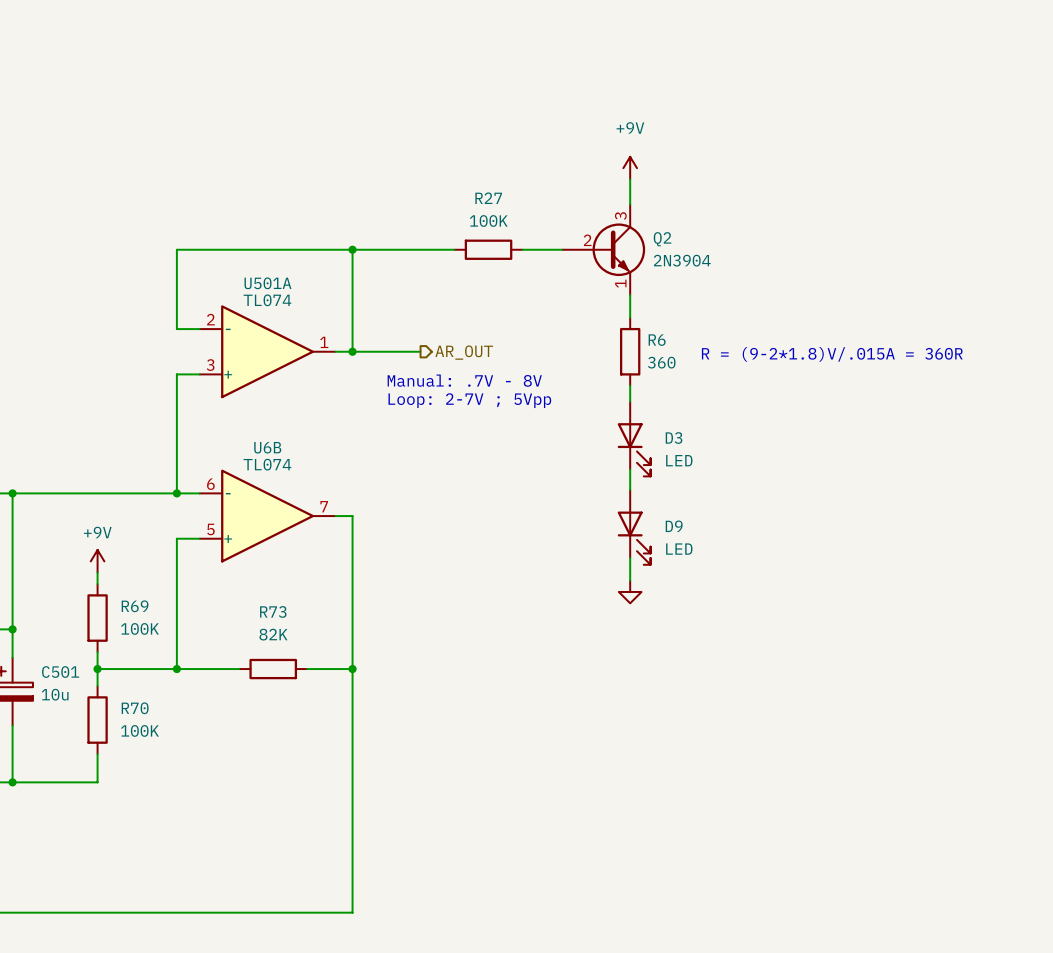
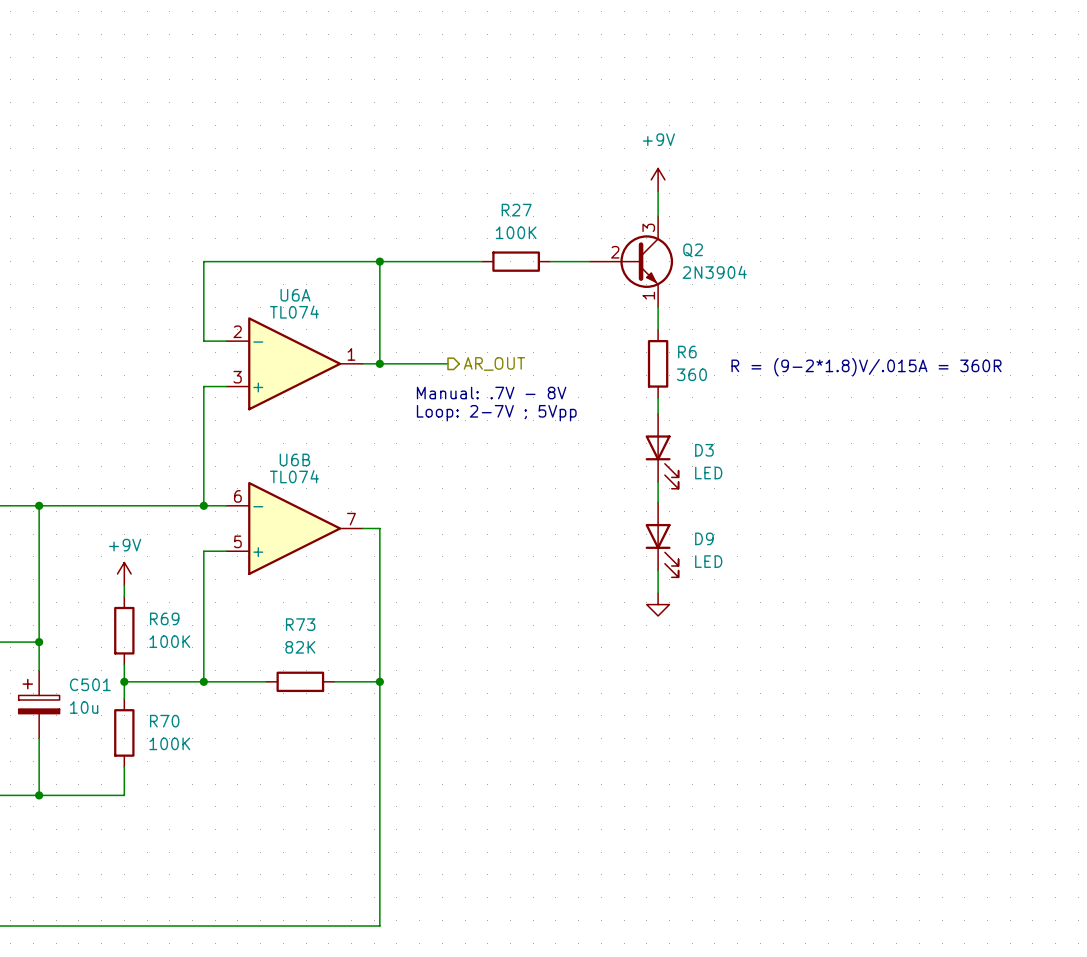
U501A name: U501A (267, 283) -> U6A (295, 295)

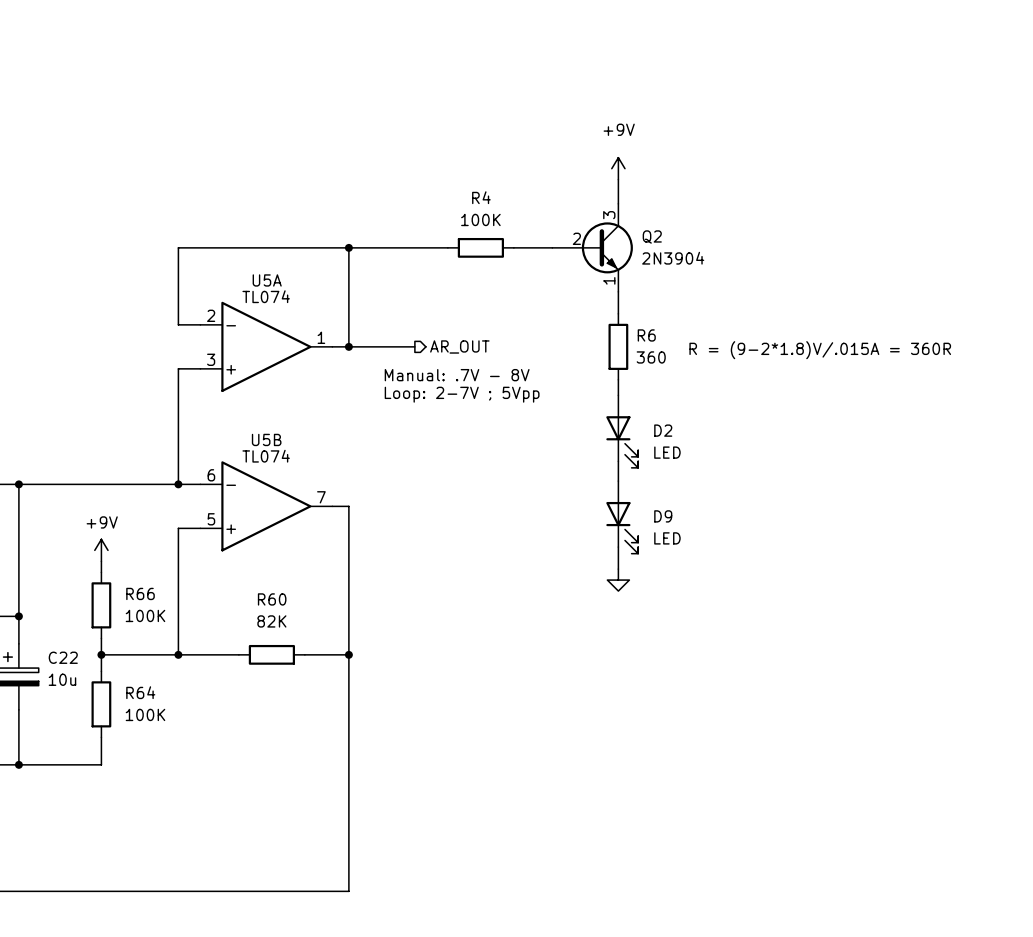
R27 name: R27 (516, 210) -> R4 (481, 197)
U6A name: U6A (295, 295) -> U5A (267, 280)
D3 name: D3 (704, 450) -> D2 (663, 430)
U6B name: U6B (294, 459) -> U5B (266, 439)
R69 name: R69 (164, 618) -> R66 (140, 593)
R73 name: R73 (300, 624) -> R60 (272, 599)
C501 name: C501 (90, 684) -> C22 (63, 657)
R70 name: R70 (164, 721) -> R64 (140, 692)

